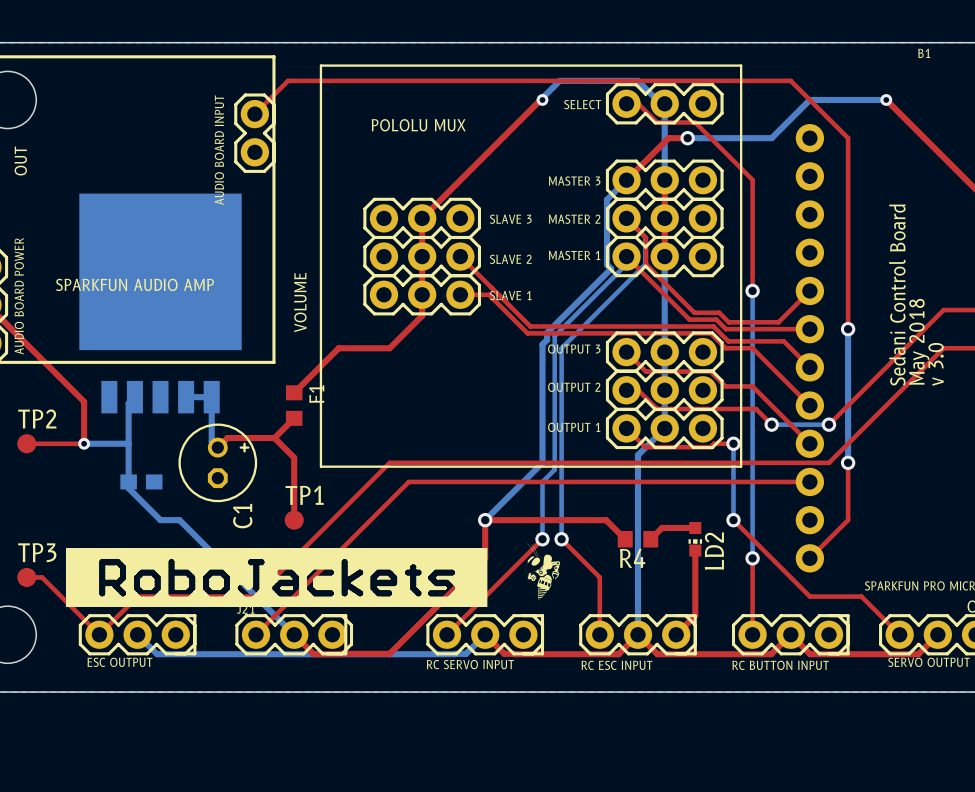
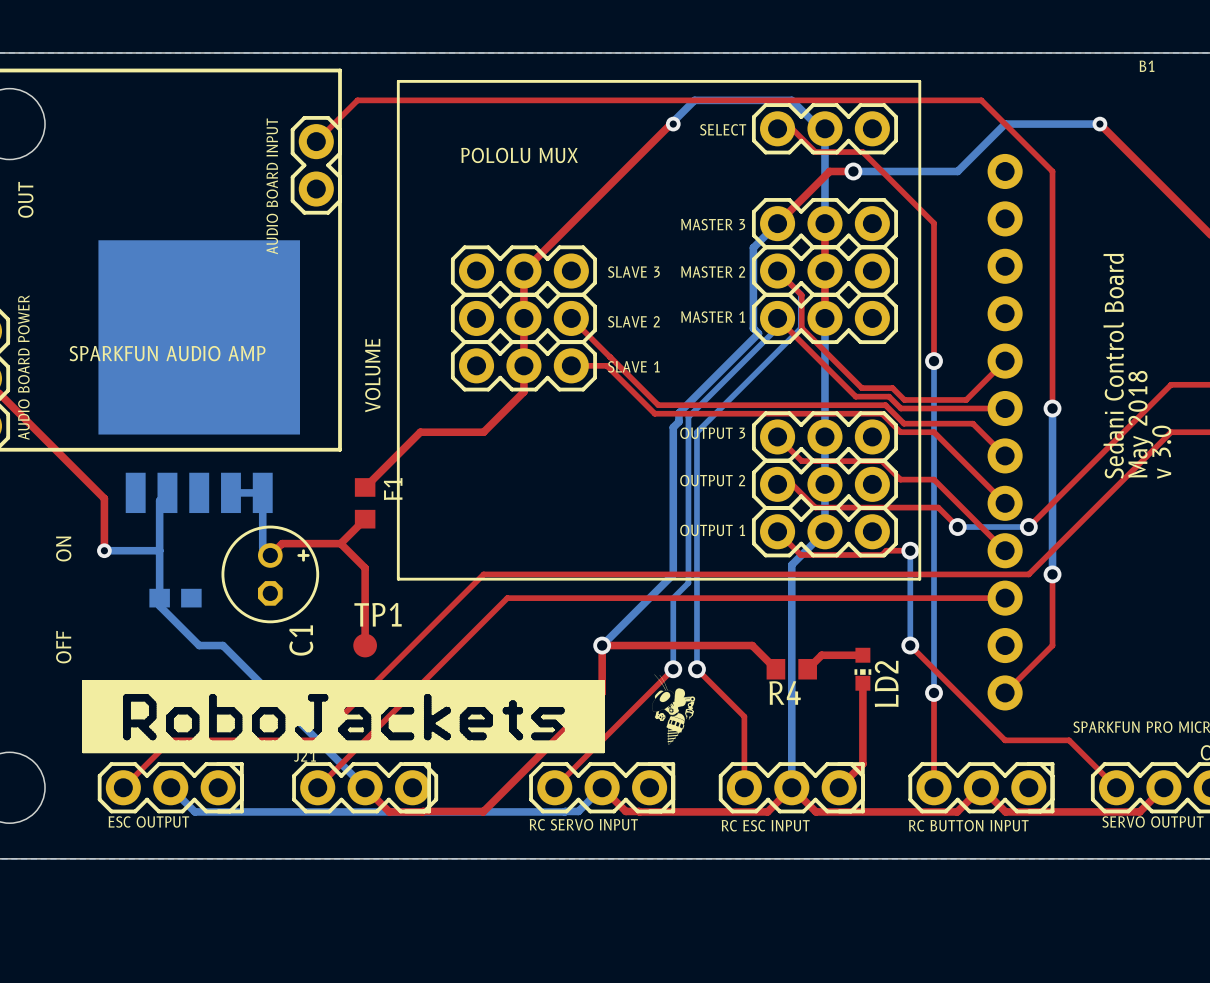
text: none -> ON (63, 549)
top track: (26, 443) (84, 443) -> none
TP2: (26, 443) -> none
text: none -> OFF (63, 647)
top track: (26, 577) (42, 577) (99, 634) -> none
TP3: (26, 577) -> none

